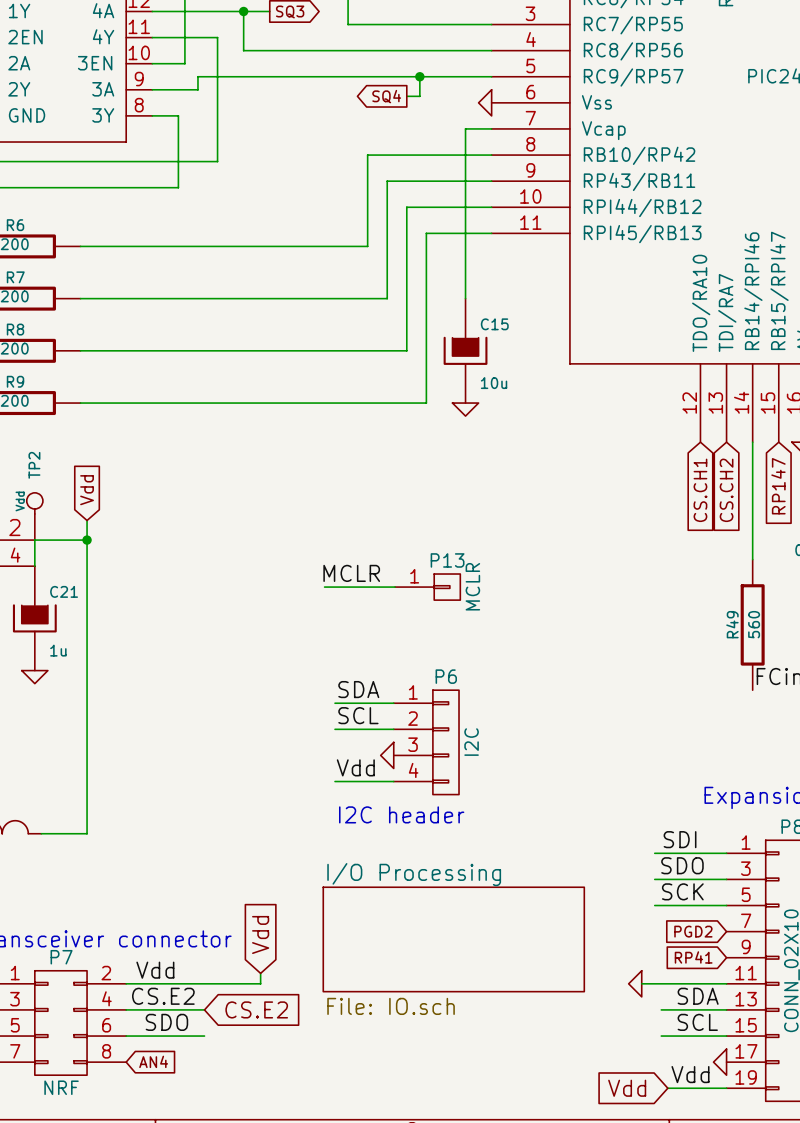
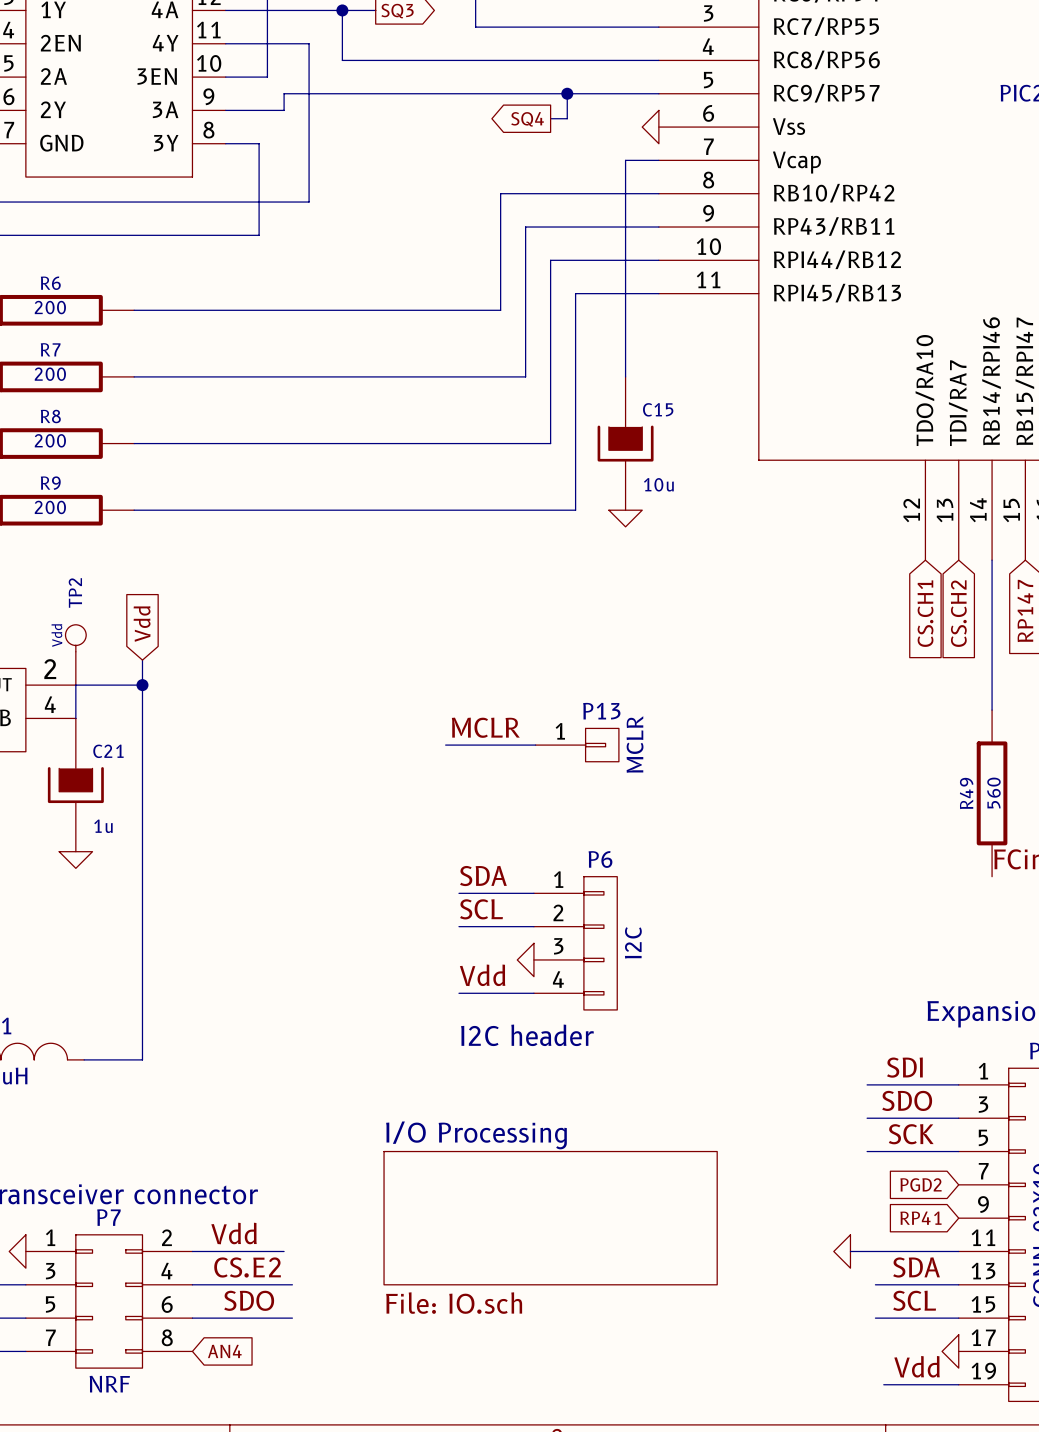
global label: Vdd (260, 934) -> none
sheet I/O Processing position: (453, 939) -> (550, 1218)
wire: (260, 973) (260, 983) (197, 983) -> none
global label: CS.E2 (256, 1009) -> none
global label: Vdd (627, 1088) -> none

